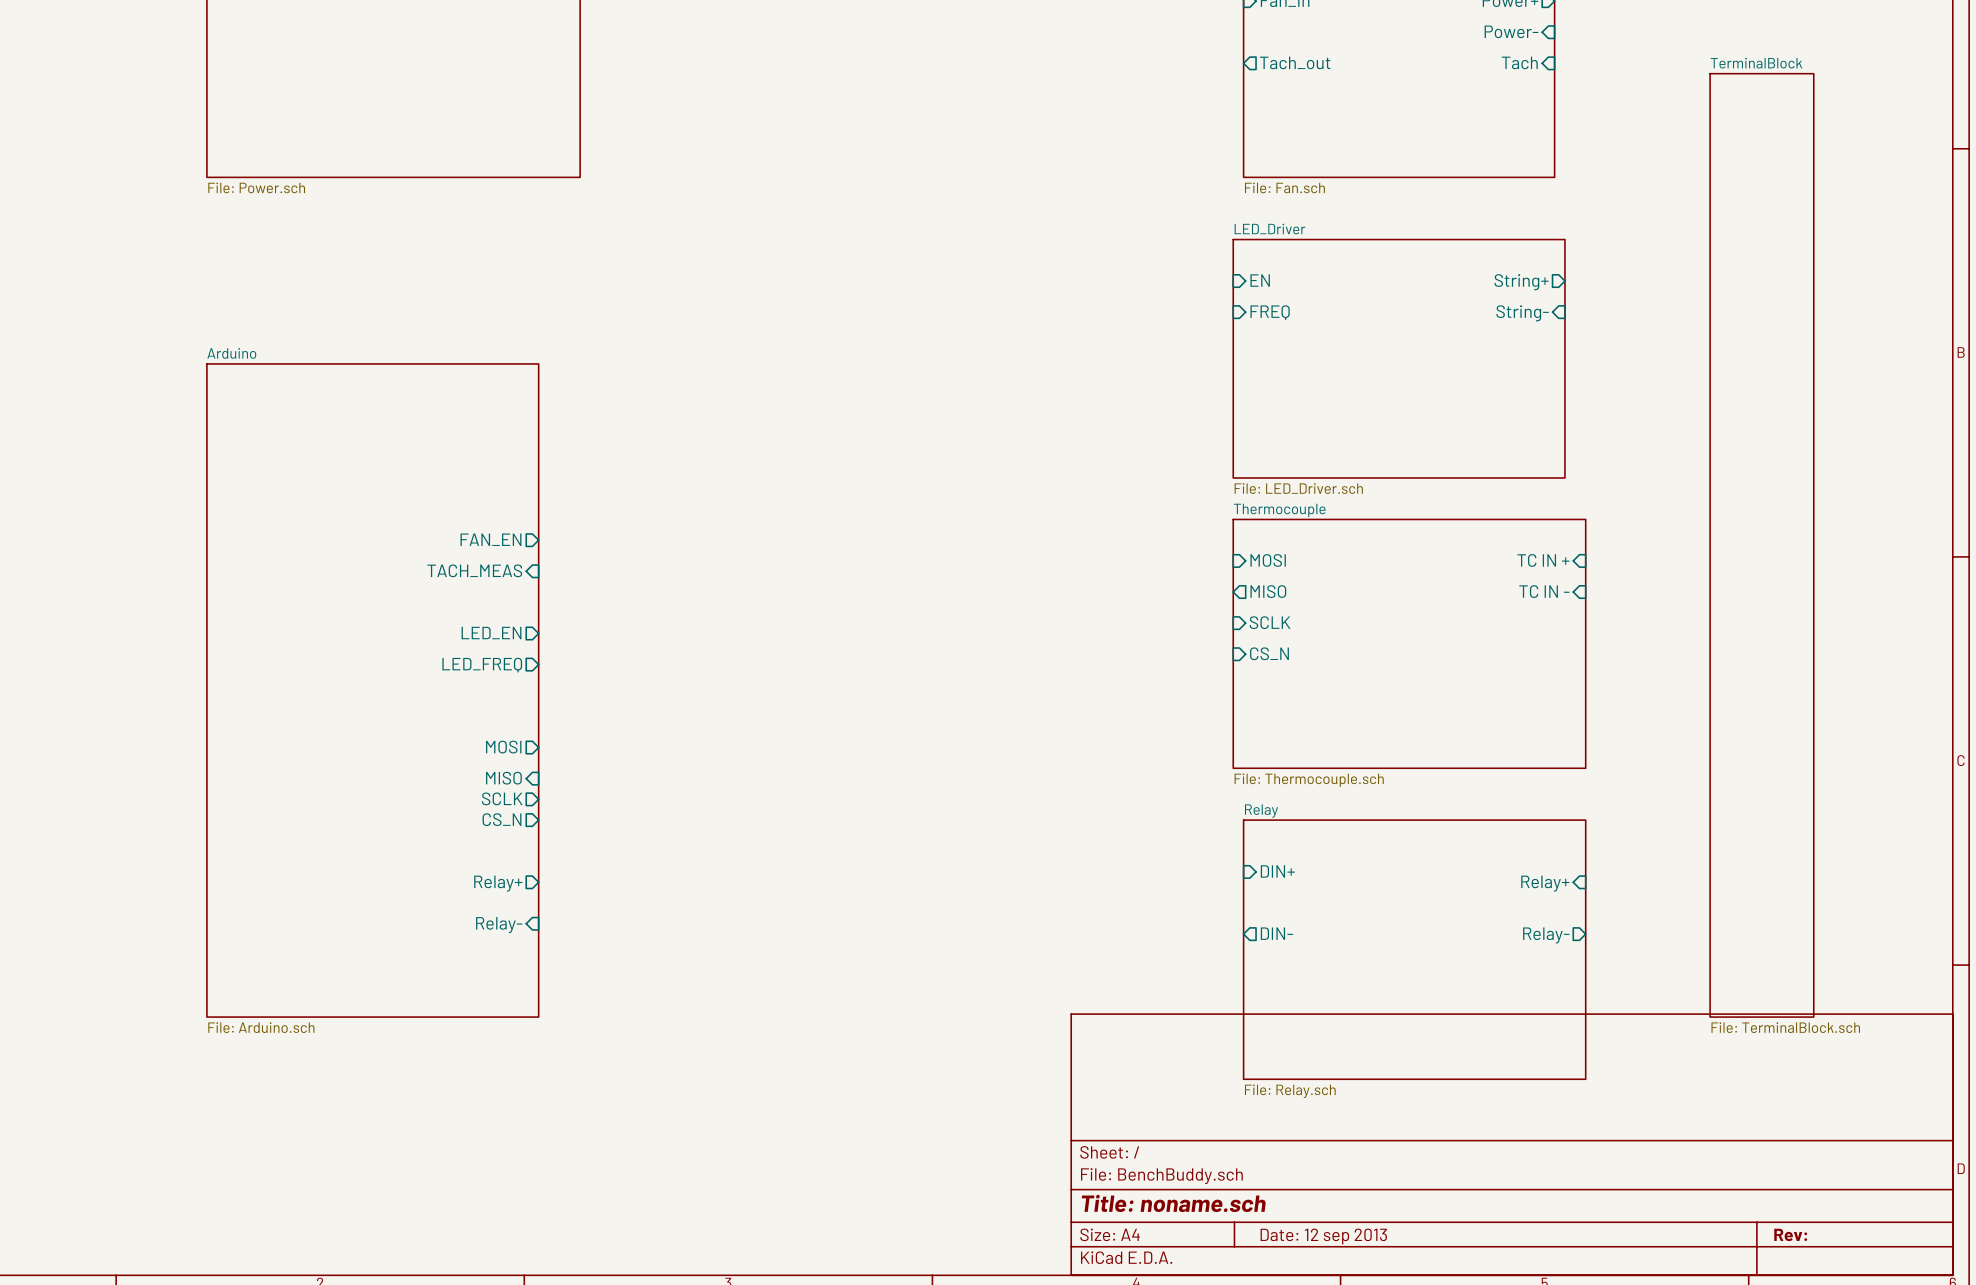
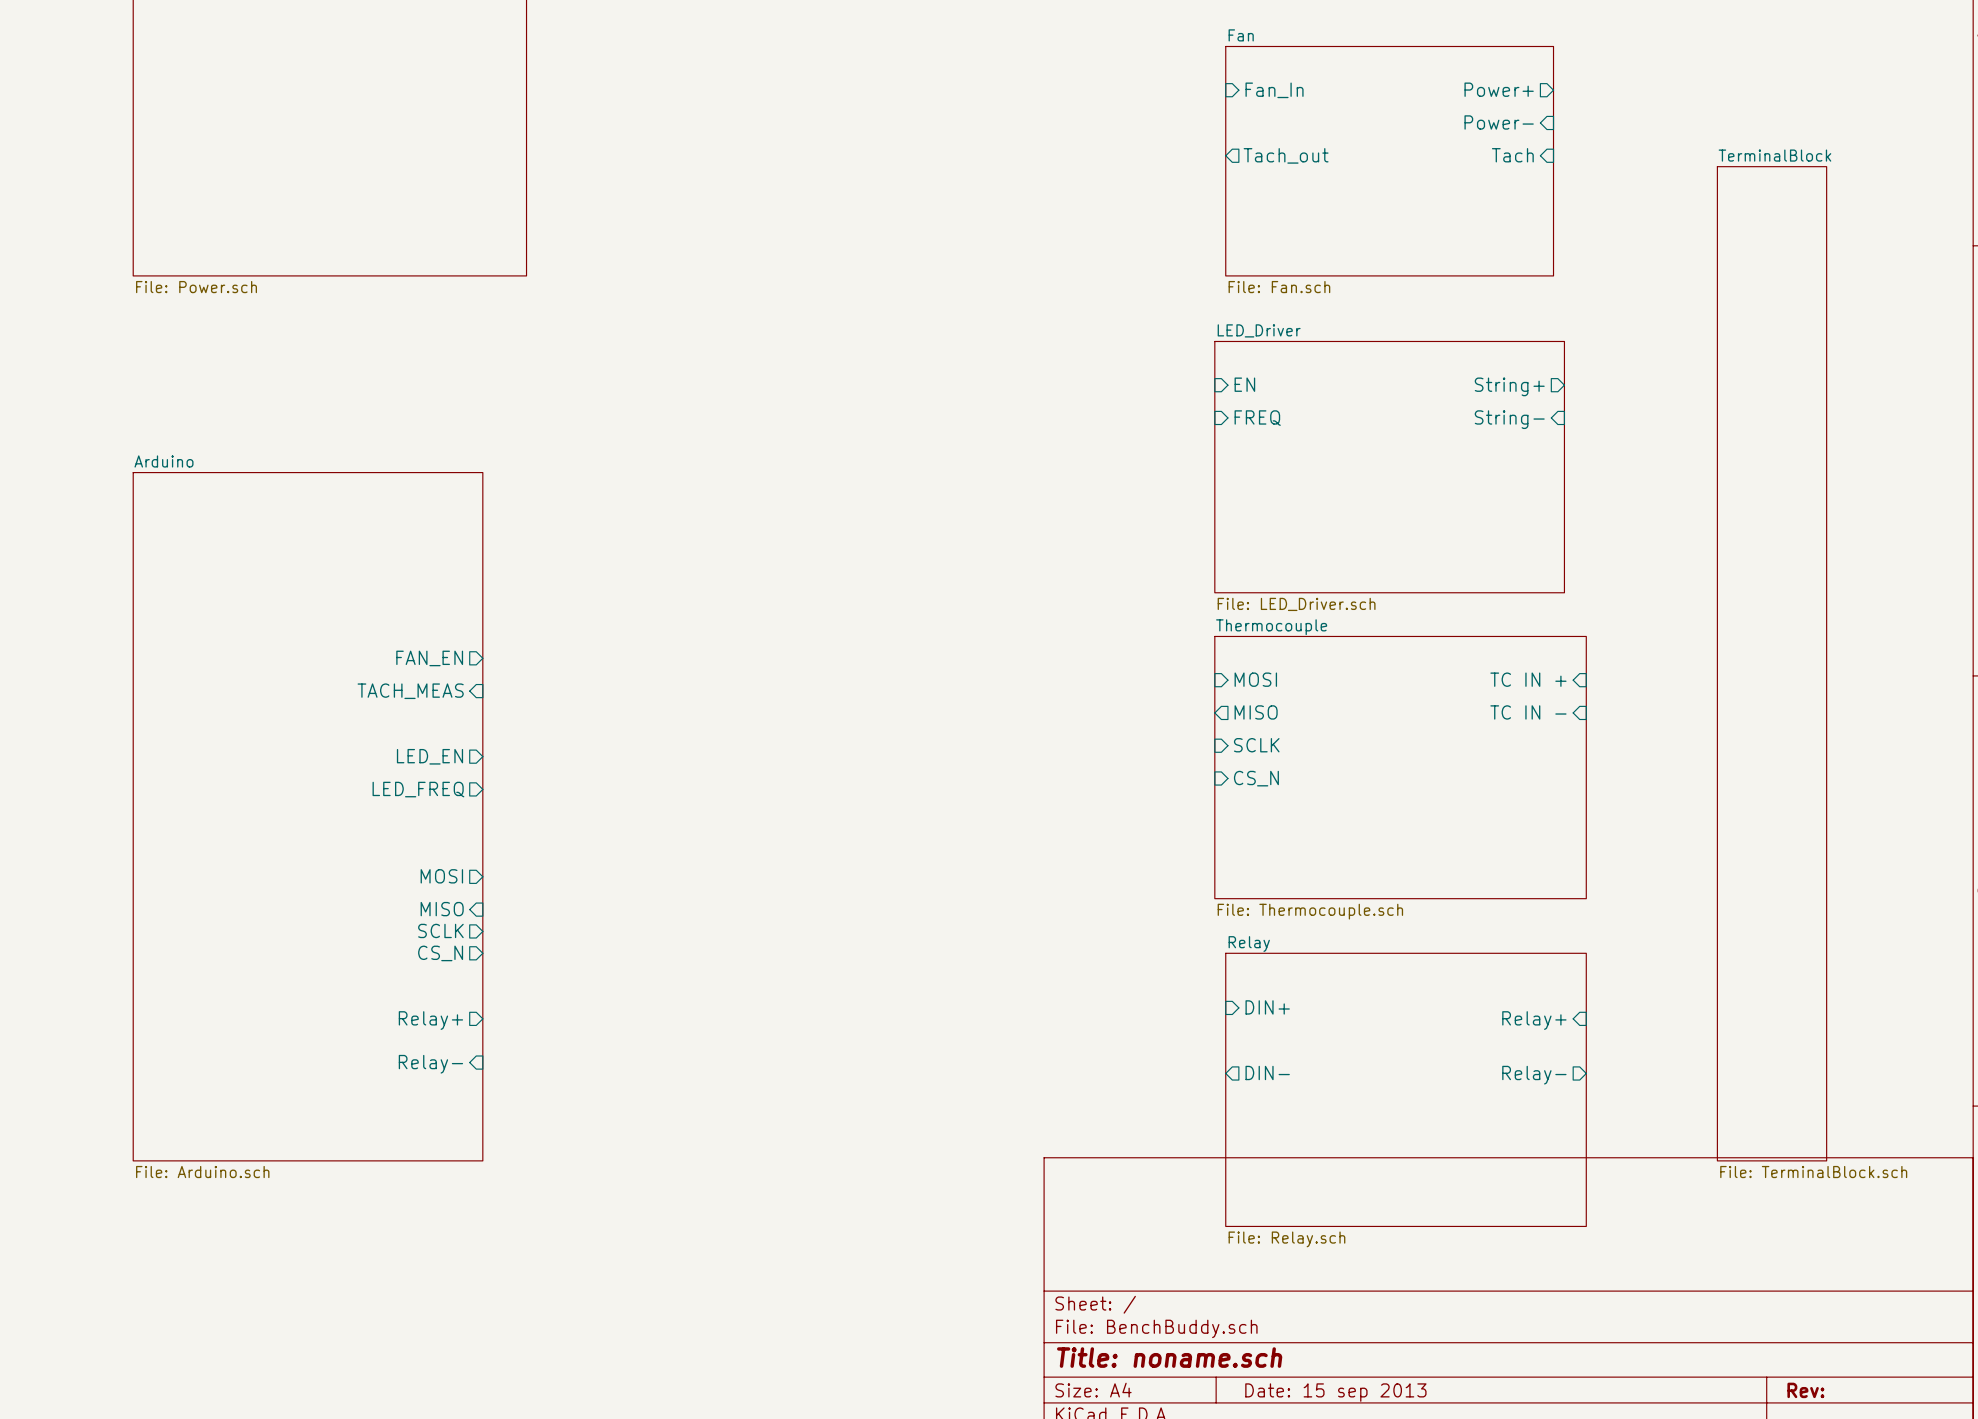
title block: Date: 12 sep 2013 (1323, 1236) -> Date: 15 sep 2013 (1335, 1392)

